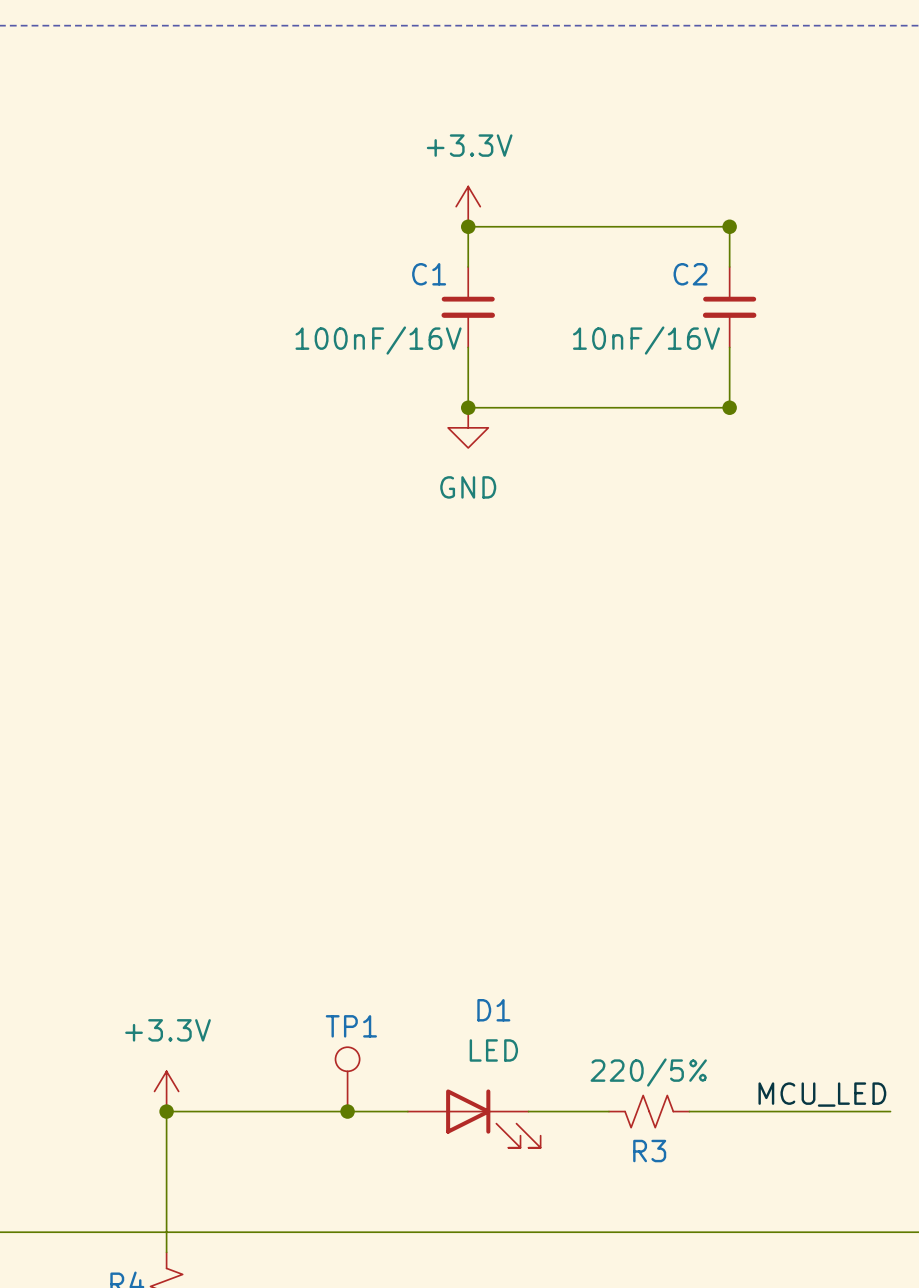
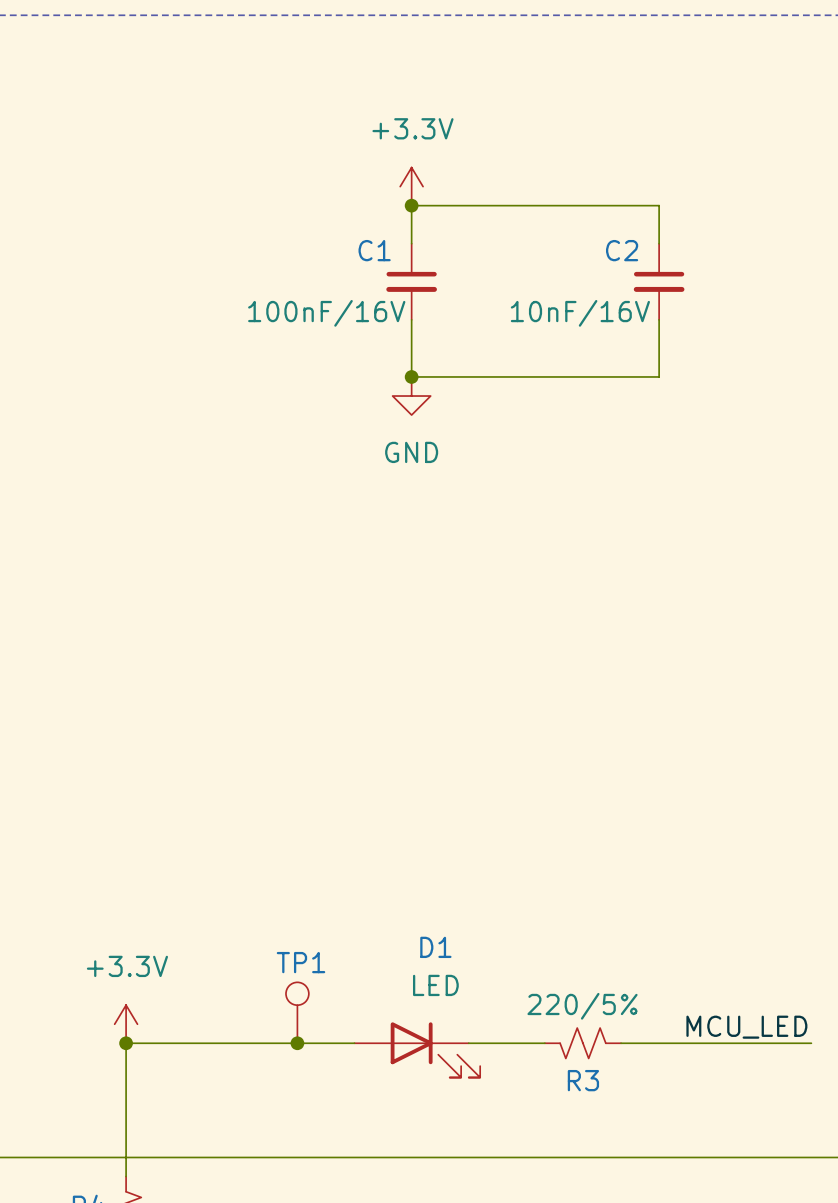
junction: (729, 226) -> none
junction: (729, 407) -> none

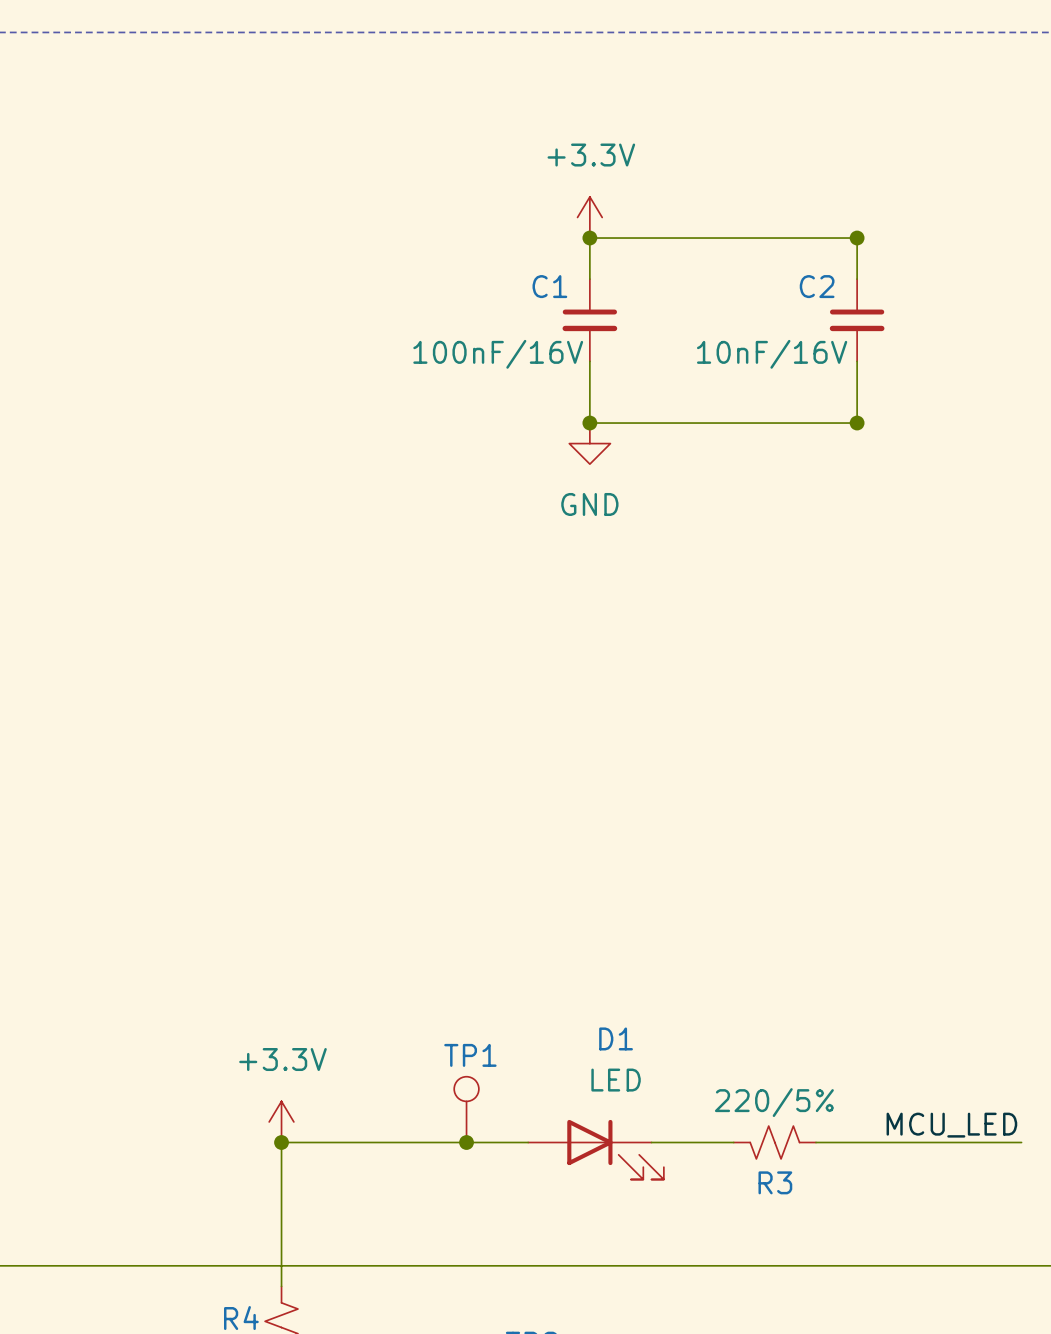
junction: none -> (857, 238)
junction: none -> (857, 423)

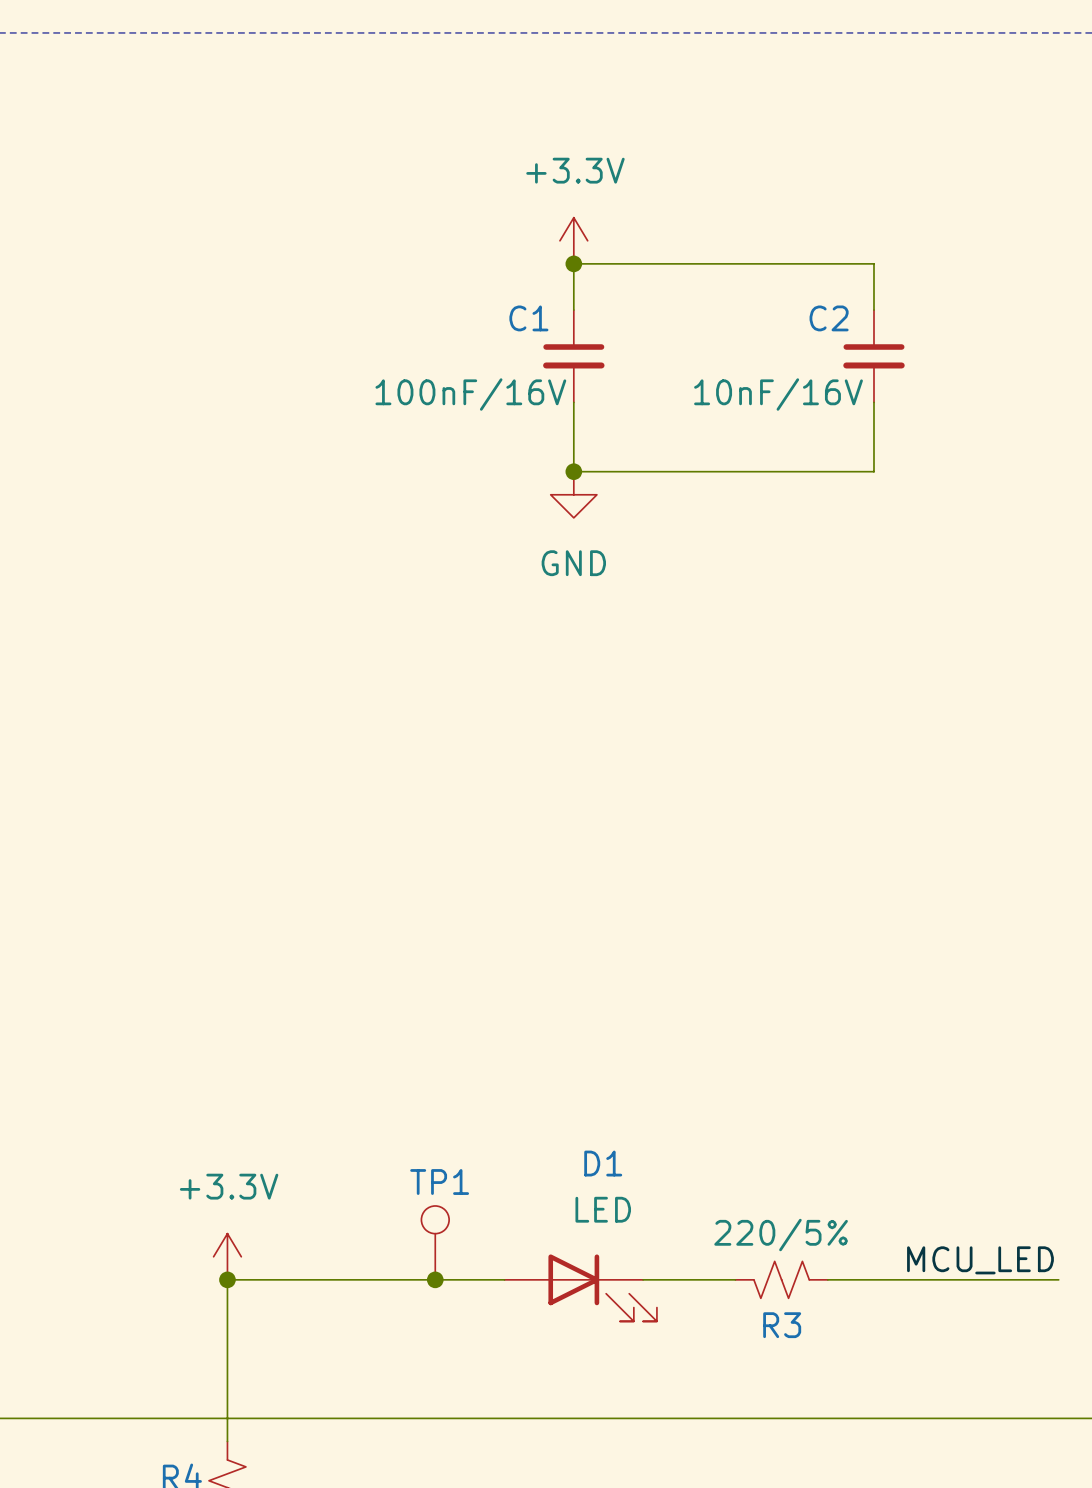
junction: (857, 238) -> none
junction: (857, 423) -> none

